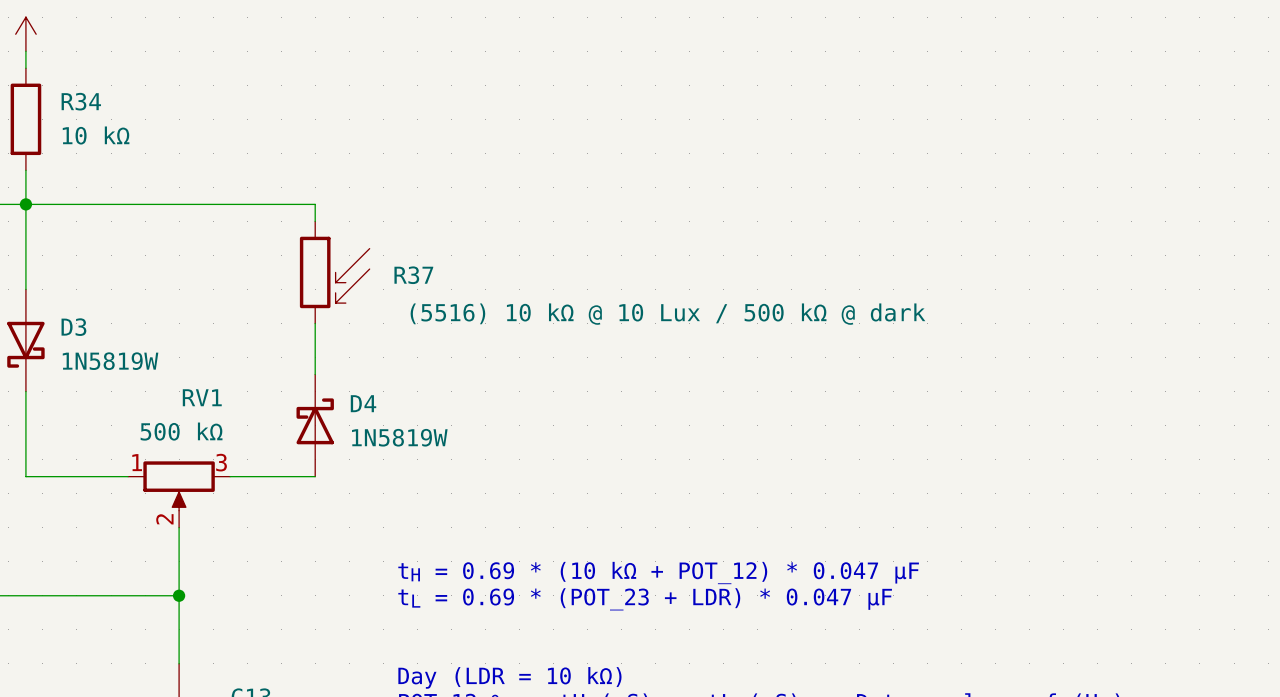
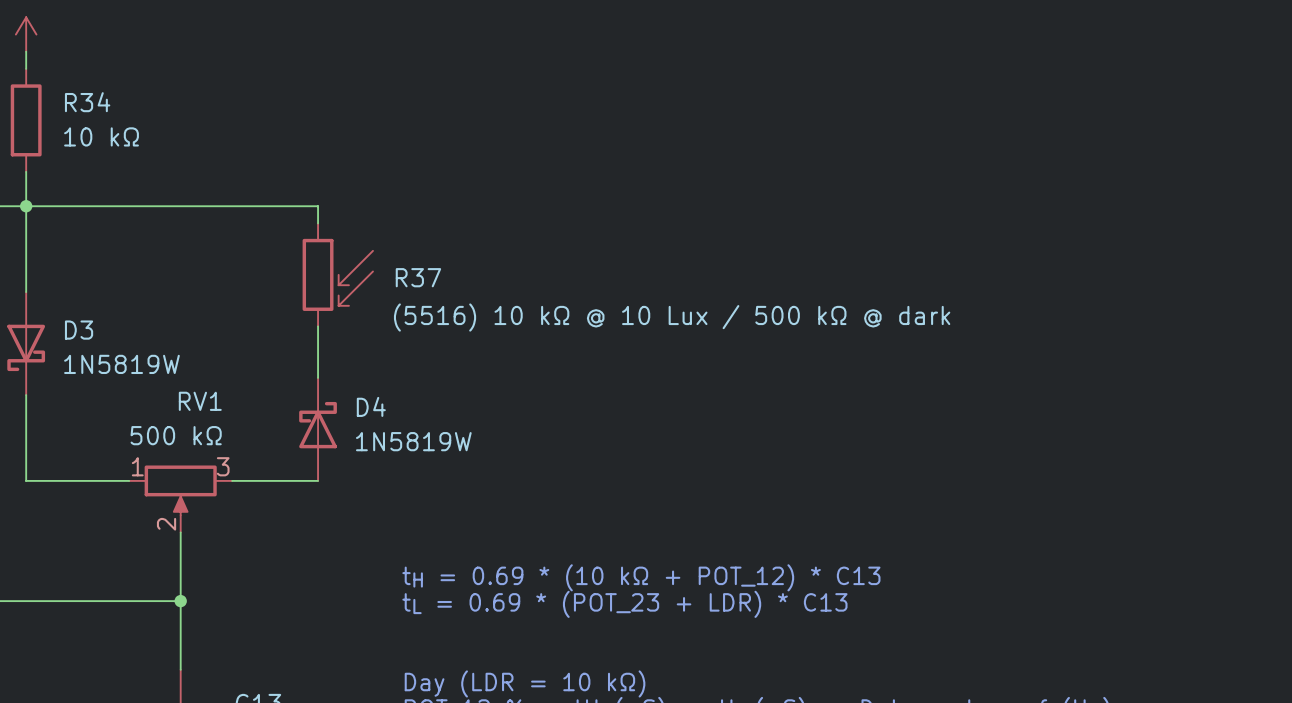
text: tH = 0.69 * (10 kΩ + POT_12) * 0.047 µF (658, 573) -> tH = 0.69 * (10 kΩ + POT_12) * C13 (641, 577)
text: tL = 0.69 * (POT_23 + LDR) * 0.047 µF (645, 599) -> tL = 0.69 * (POT_23 + LDR) * C13 (624, 604)

